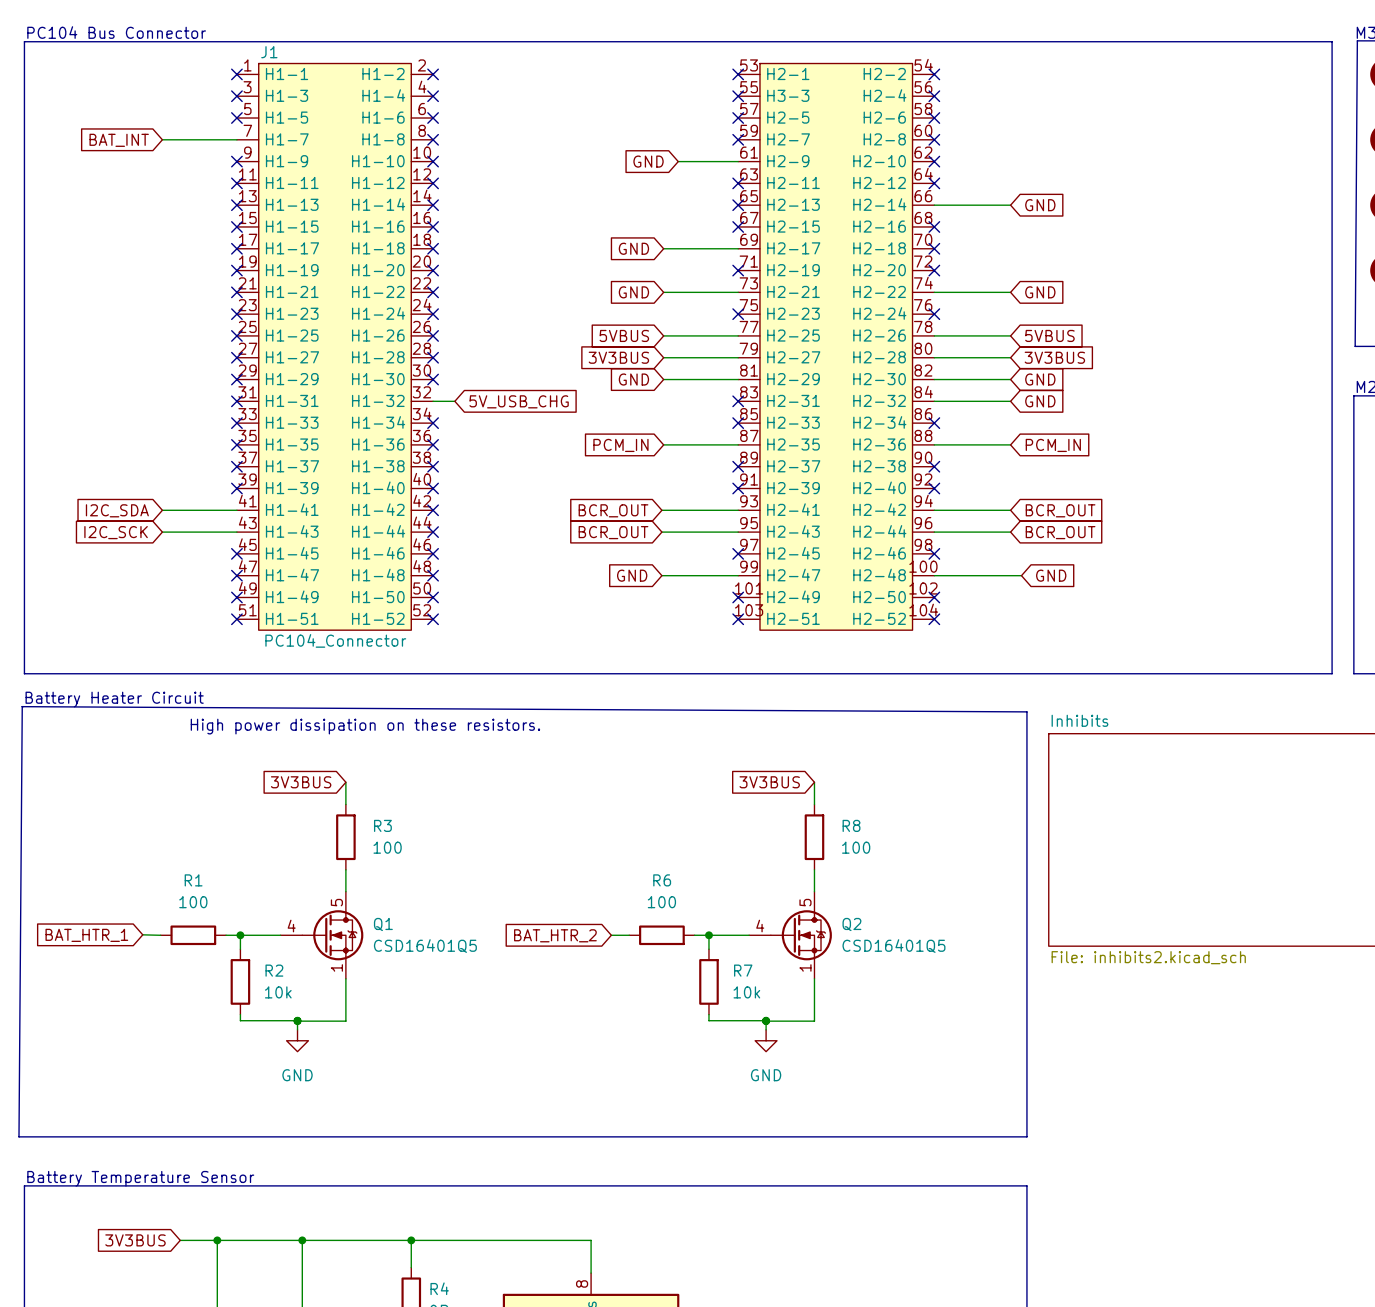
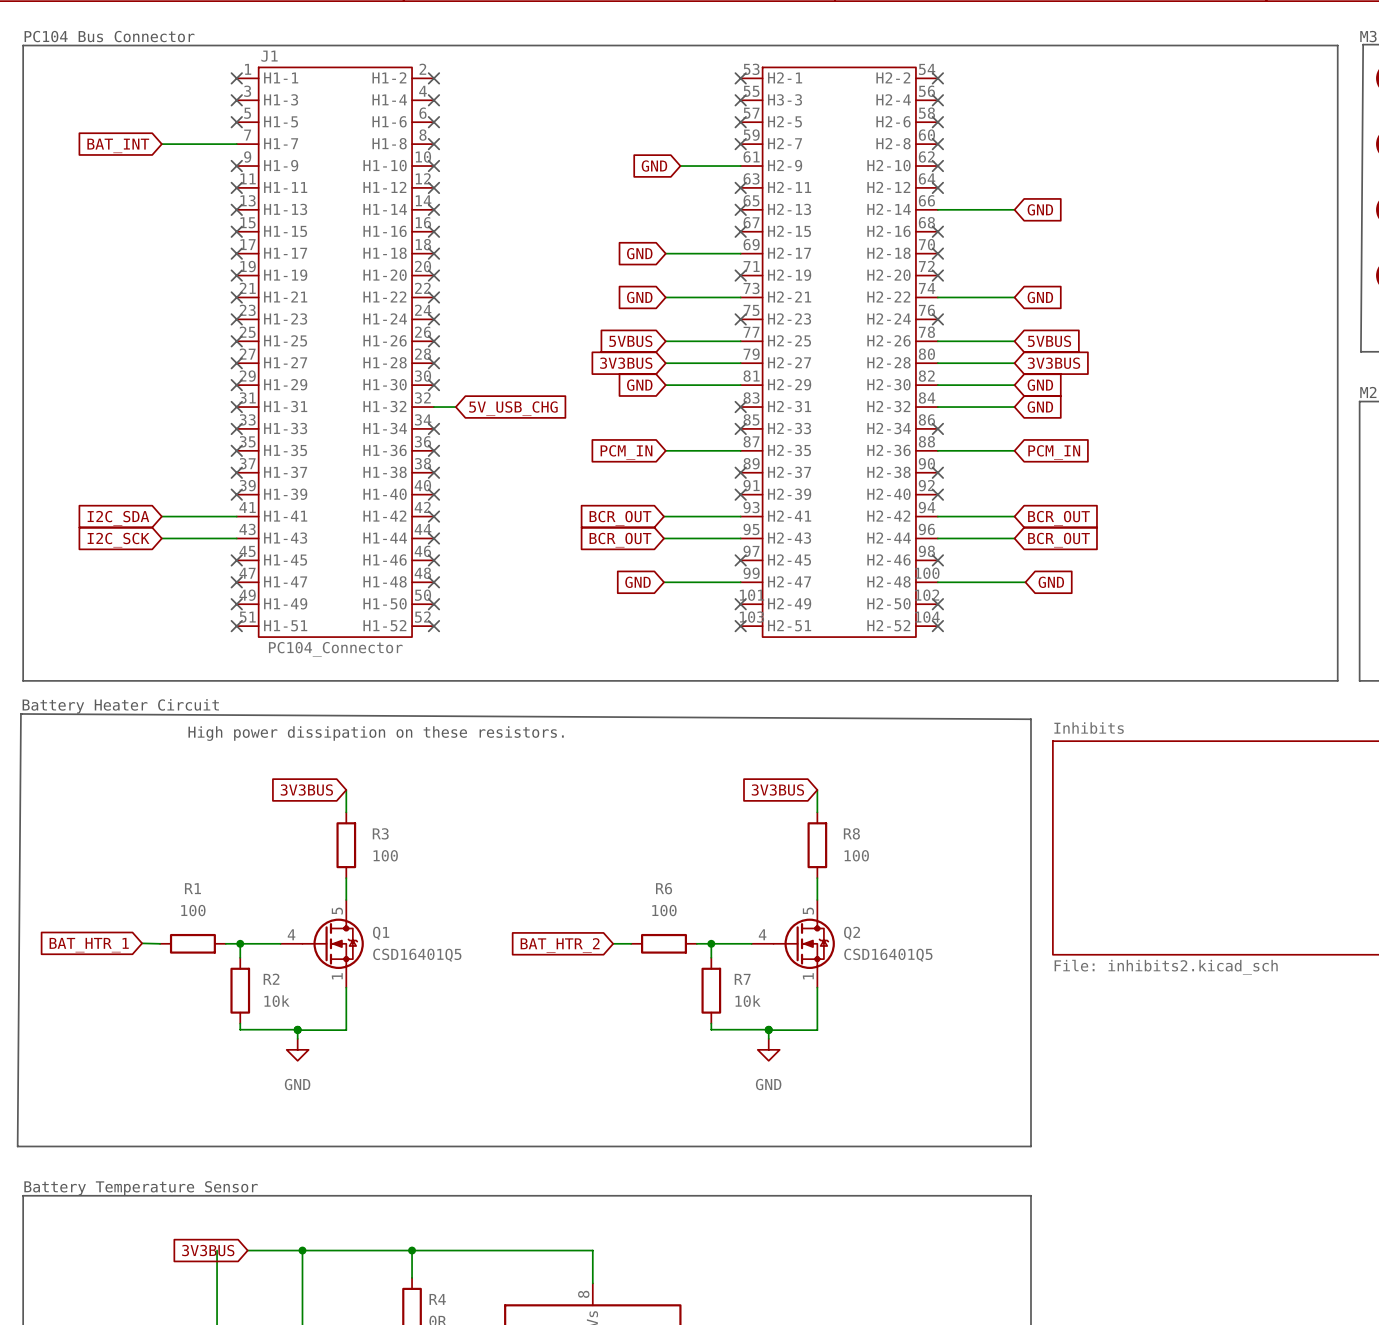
global label position: 3V3BUS (135, 1240) -> 3V3BUS (208, 1250)
wire: (180, 1240) (247, 1240) -> none
junction: (217, 1240) -> none

